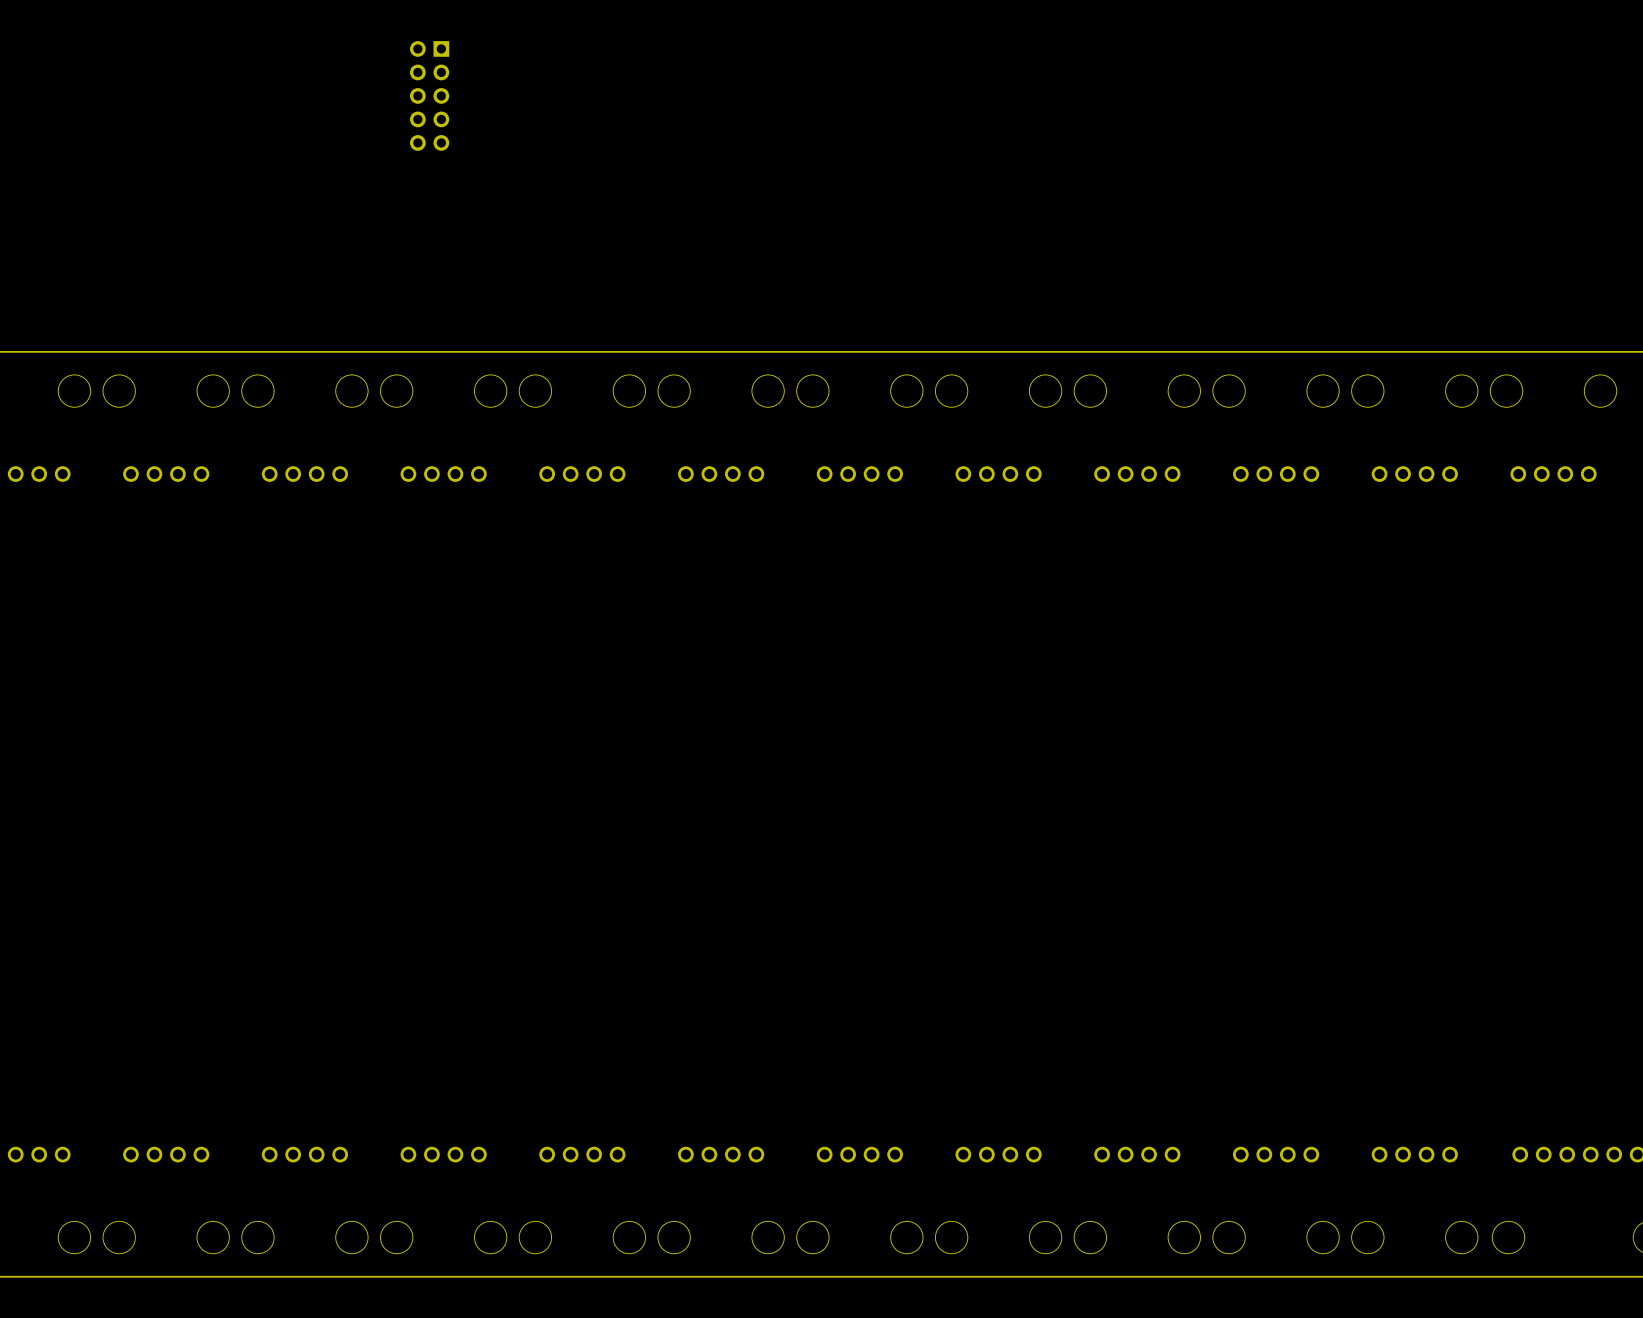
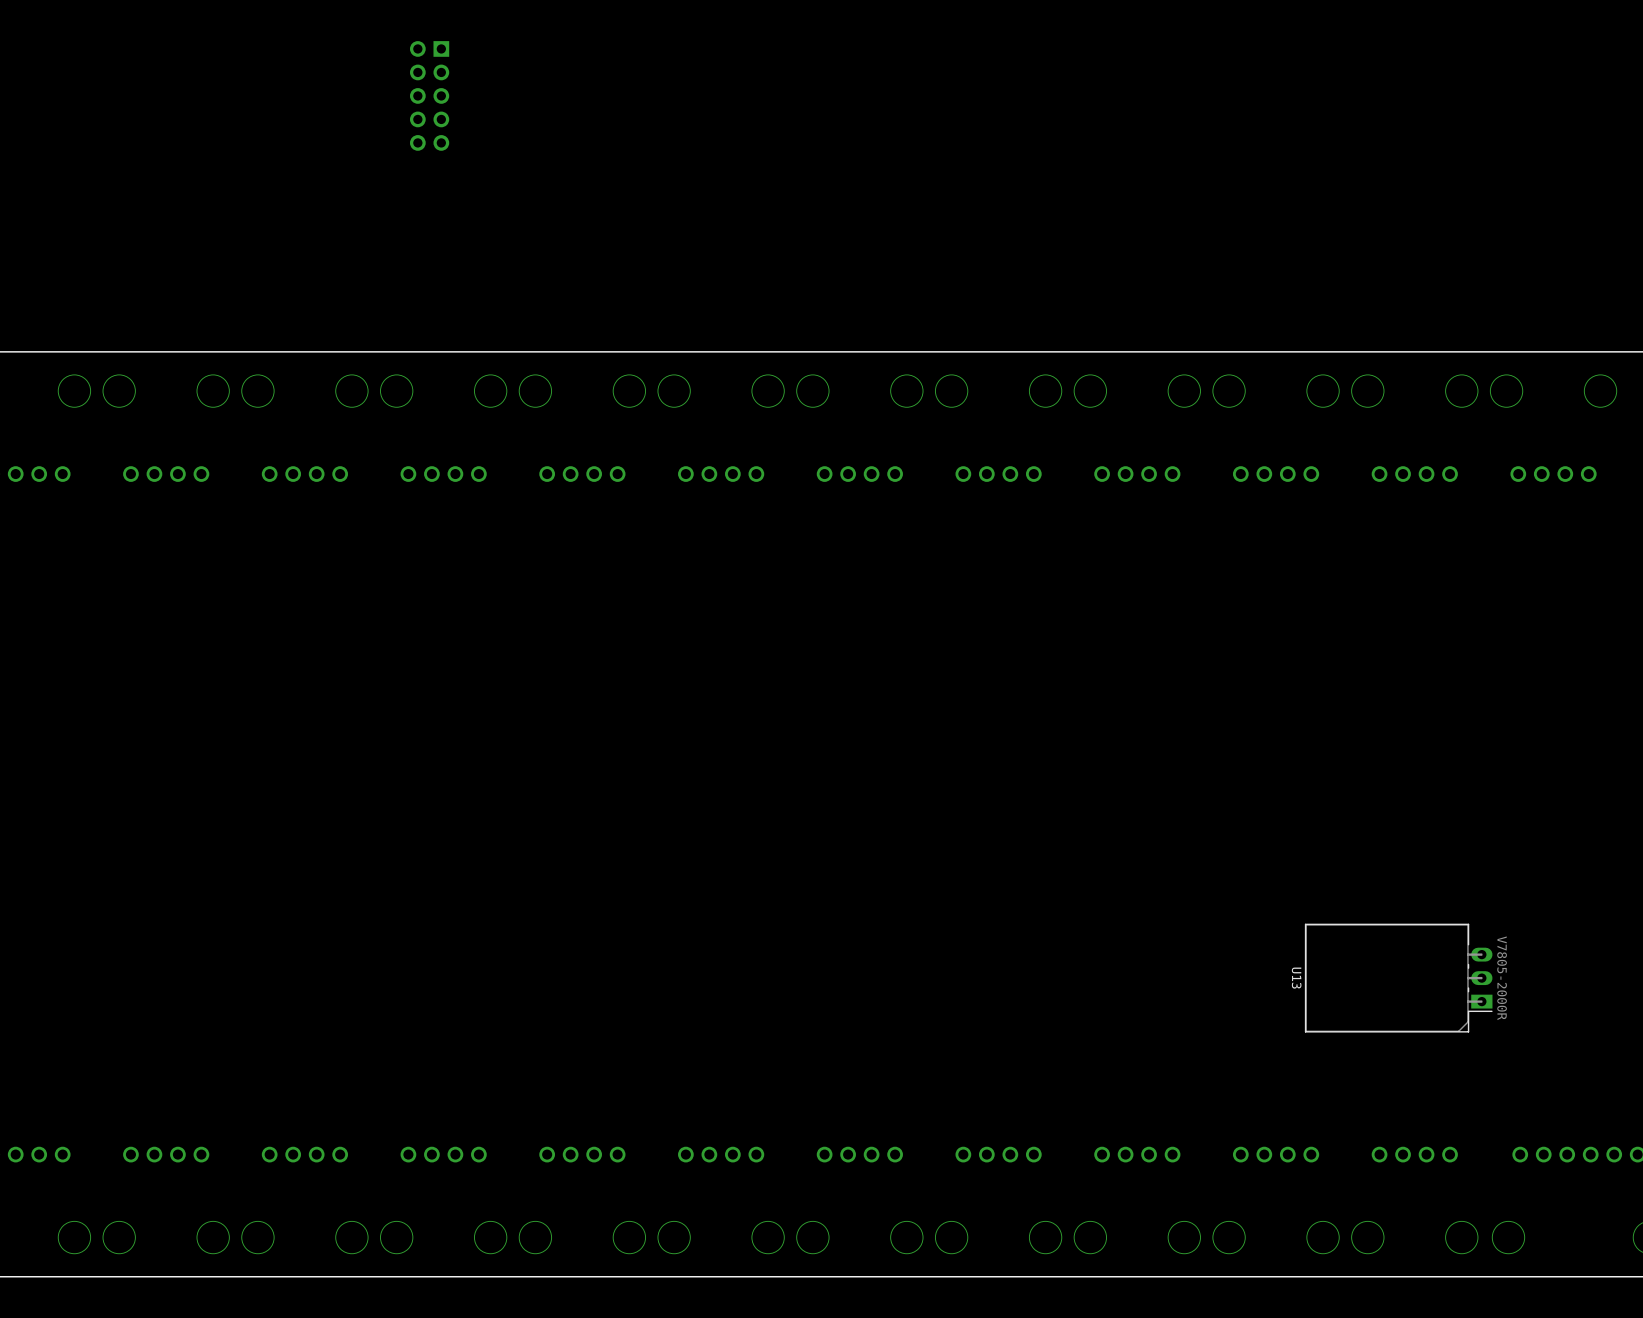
U13: none -> V7805-2000R (1398, 978)

